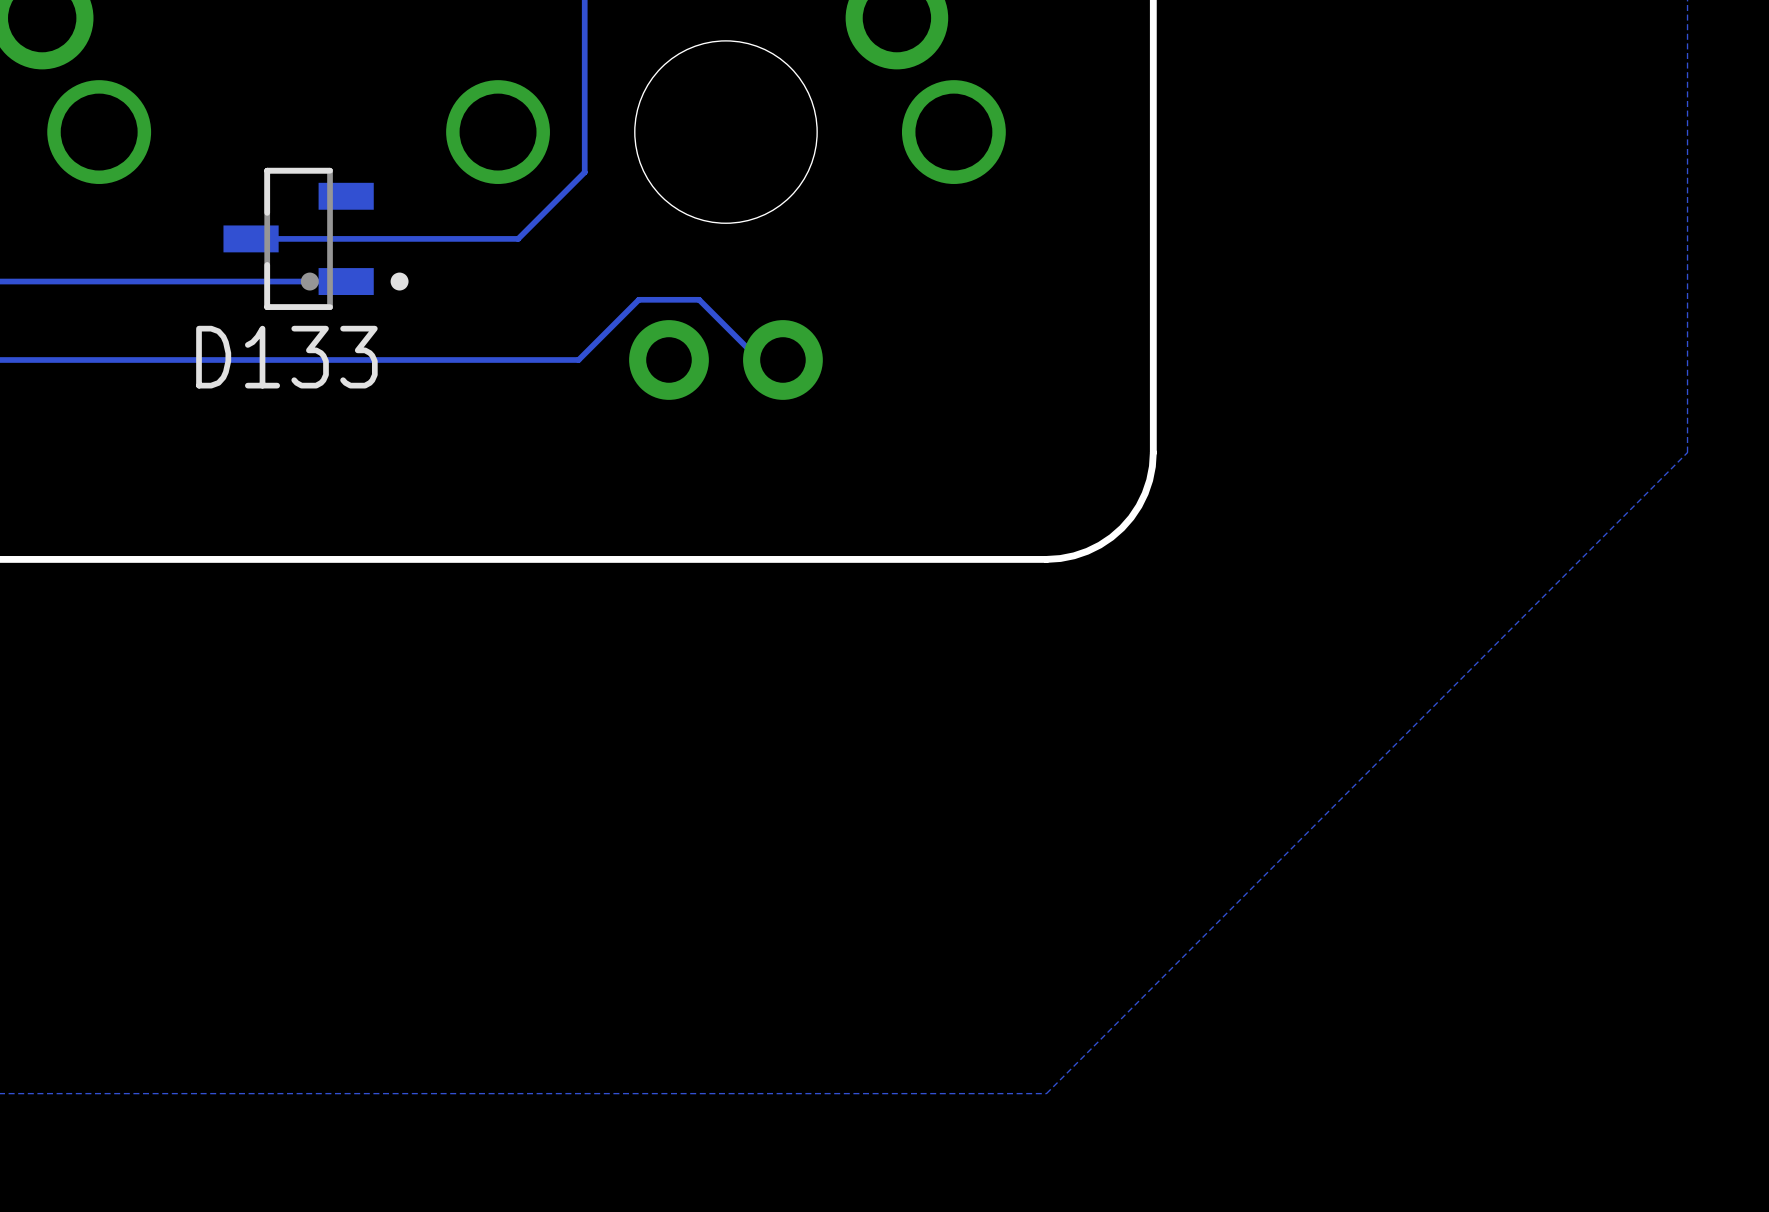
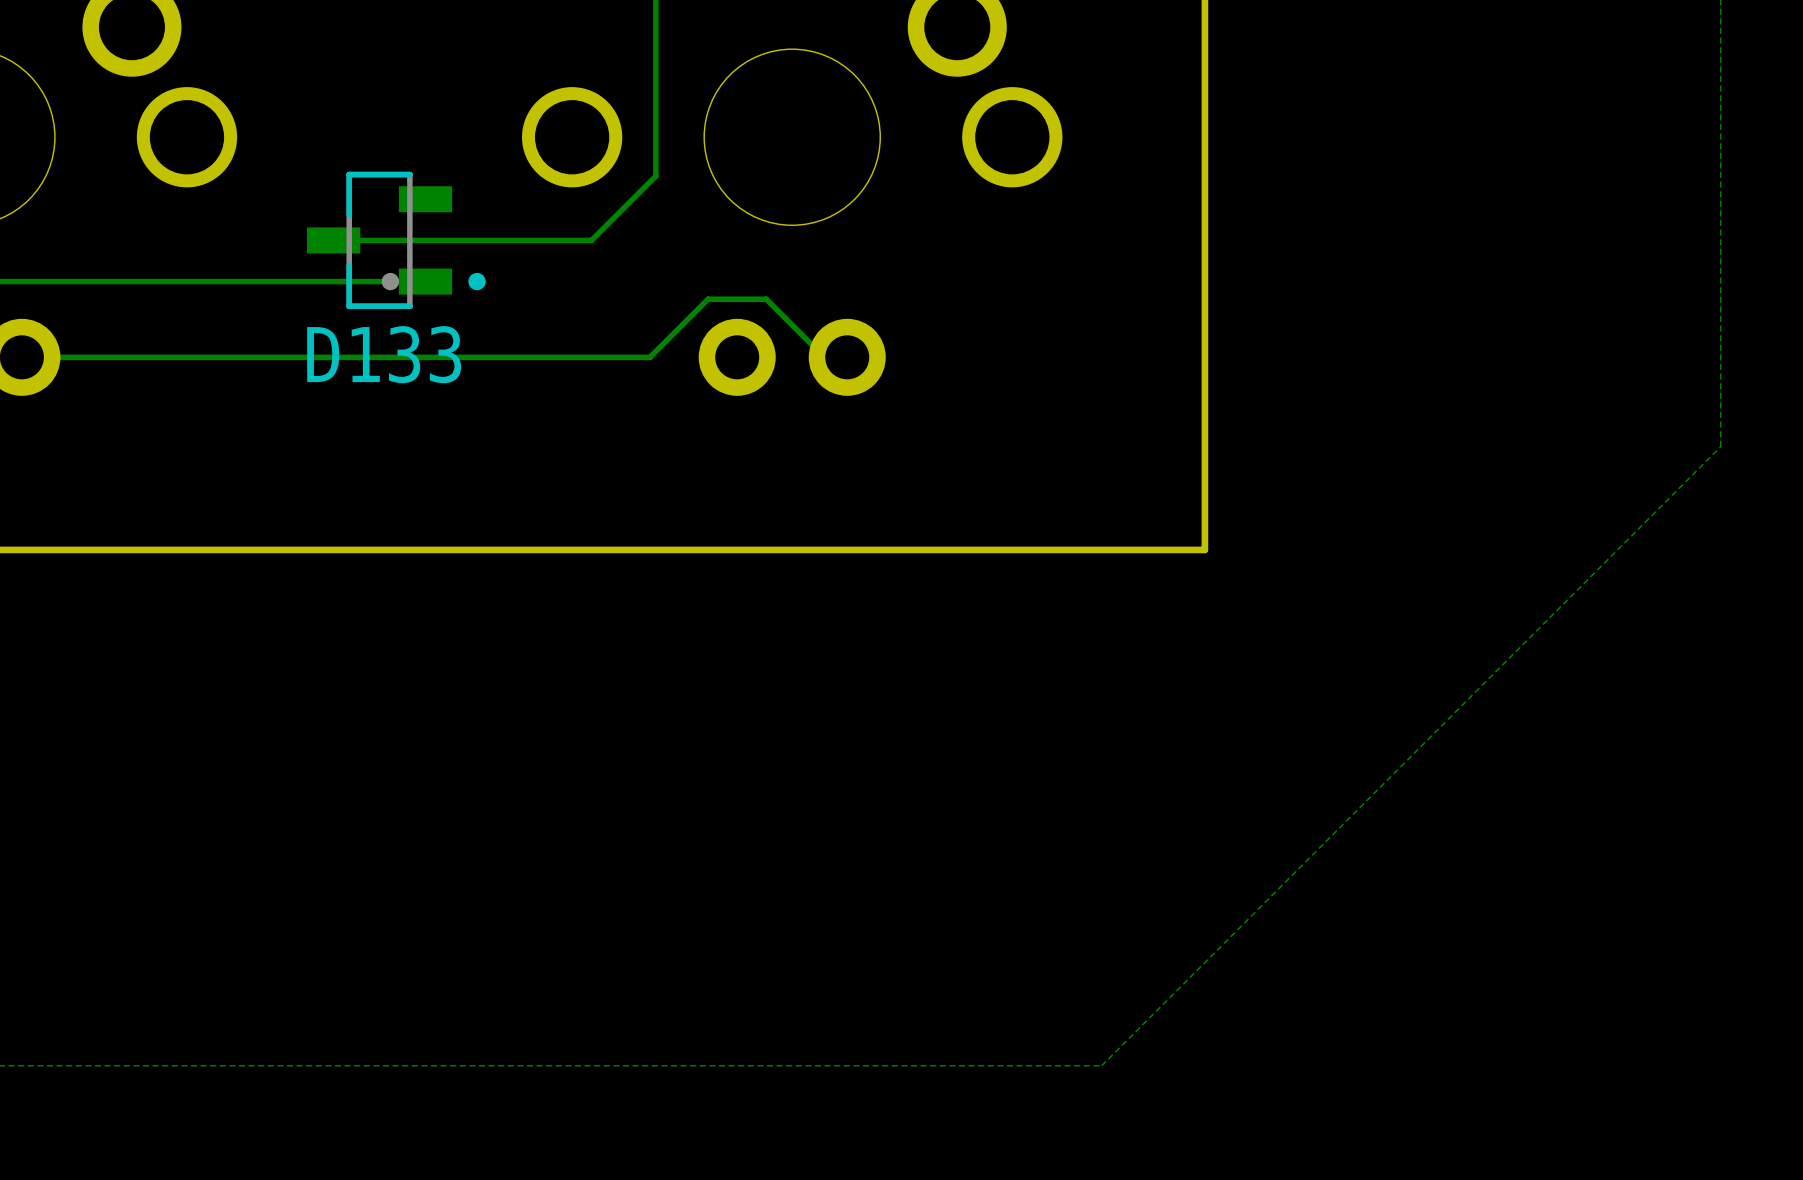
board edge: (1153, 452) (1149, 480) (1145, 493) (1139, 506) (1122, 528) (1099, 545) (1087, 551) (1074, 555) (1046, 559) -> (1204, 446) (1204, 549) (1101, 549)

